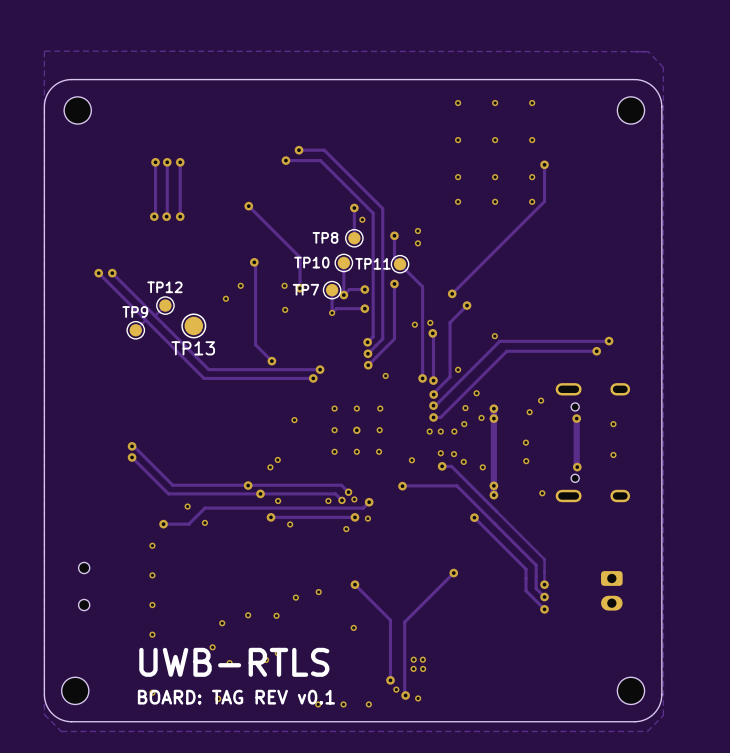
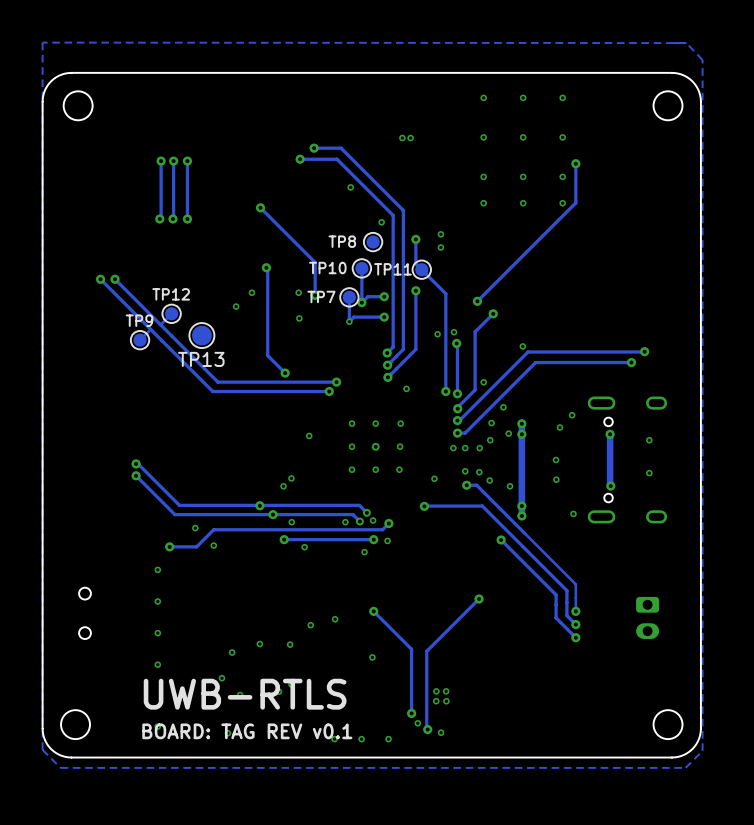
via: none -> (402, 138)
via: none -> (410, 138)
via: none -> (350, 187)
track: (354, 208) (354, 238) -> none
via: (354, 208) -> none

